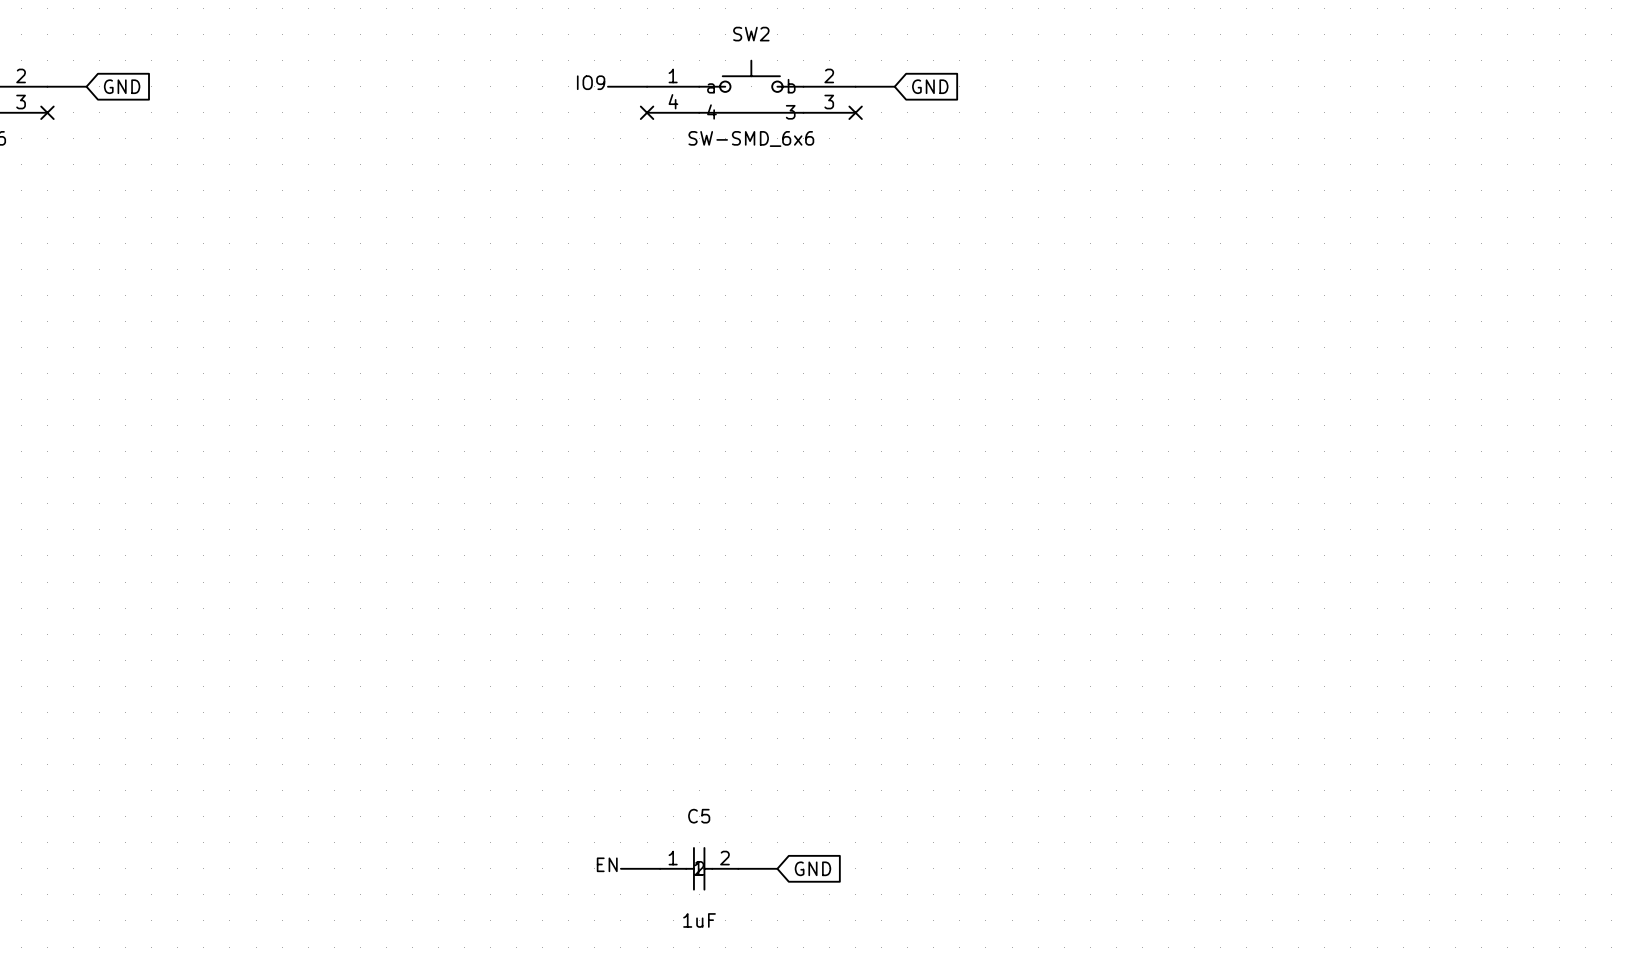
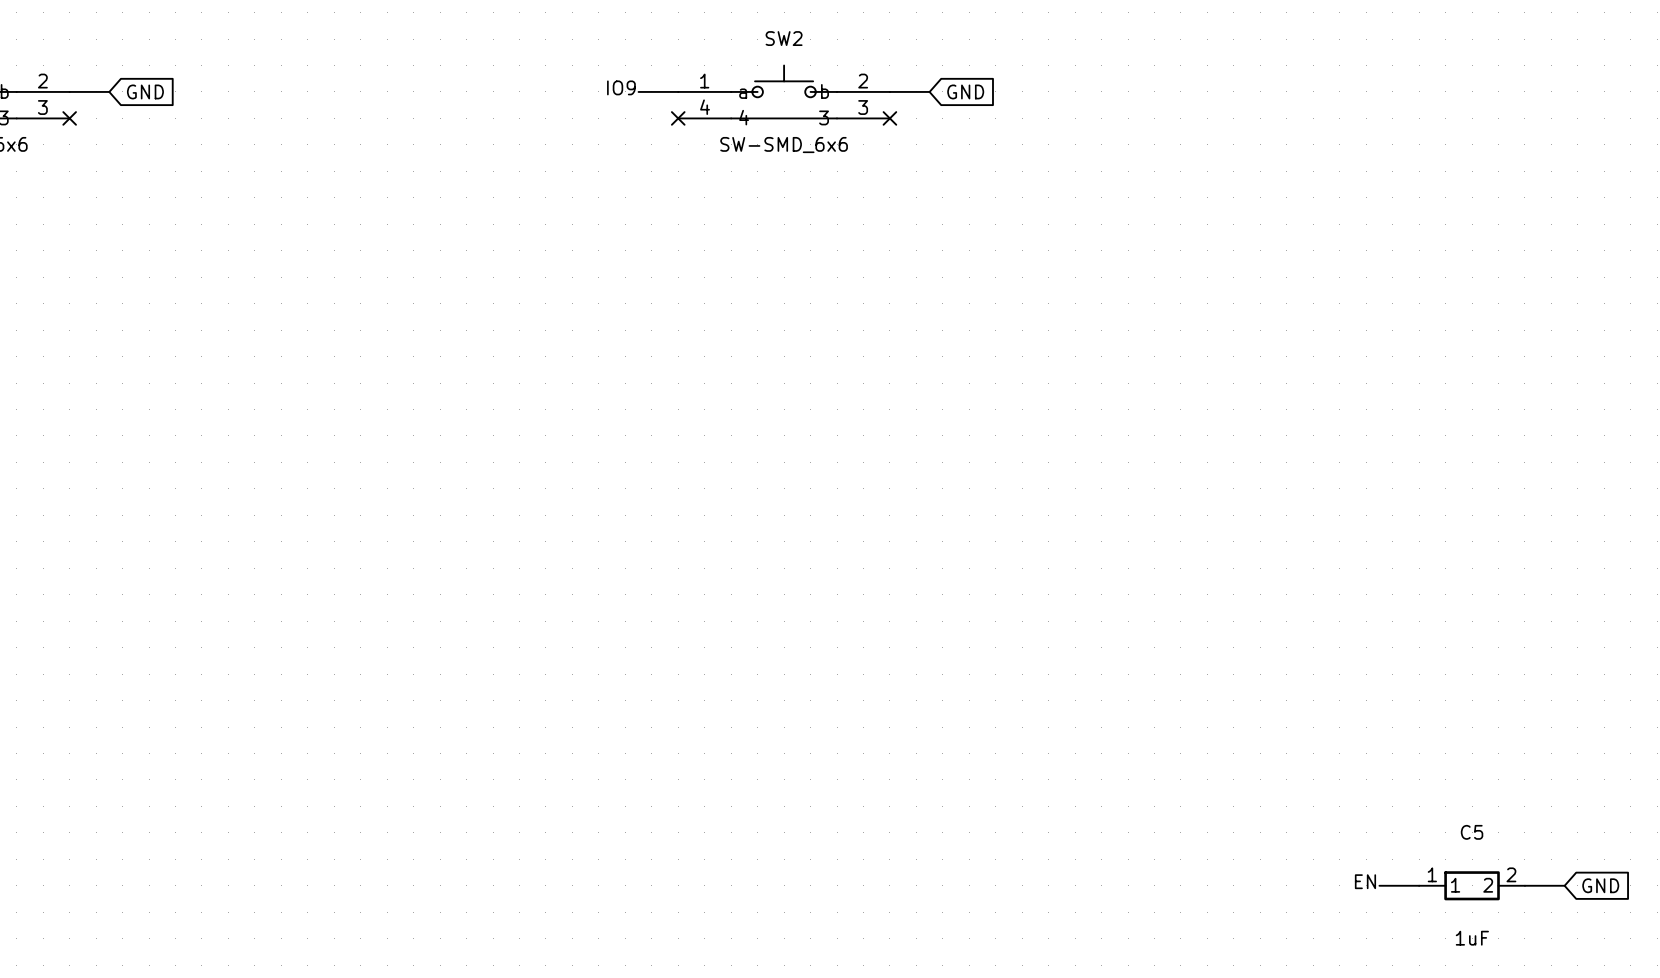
C5 symbol: [660, 847, 739, 890] -> [1419, 871, 1525, 901]
label: EN (607, 864) -> none
label: none -> EN (1365, 881)
wire: (620, 868) (660, 868) -> none
wire: (738, 868) (777, 868) -> none
global label: GND (812, 868) -> none
wire: none -> (1379, 885) (1419, 885)
wire: none -> (1524, 885) (1564, 885)
global label: none -> GND (1600, 885)

